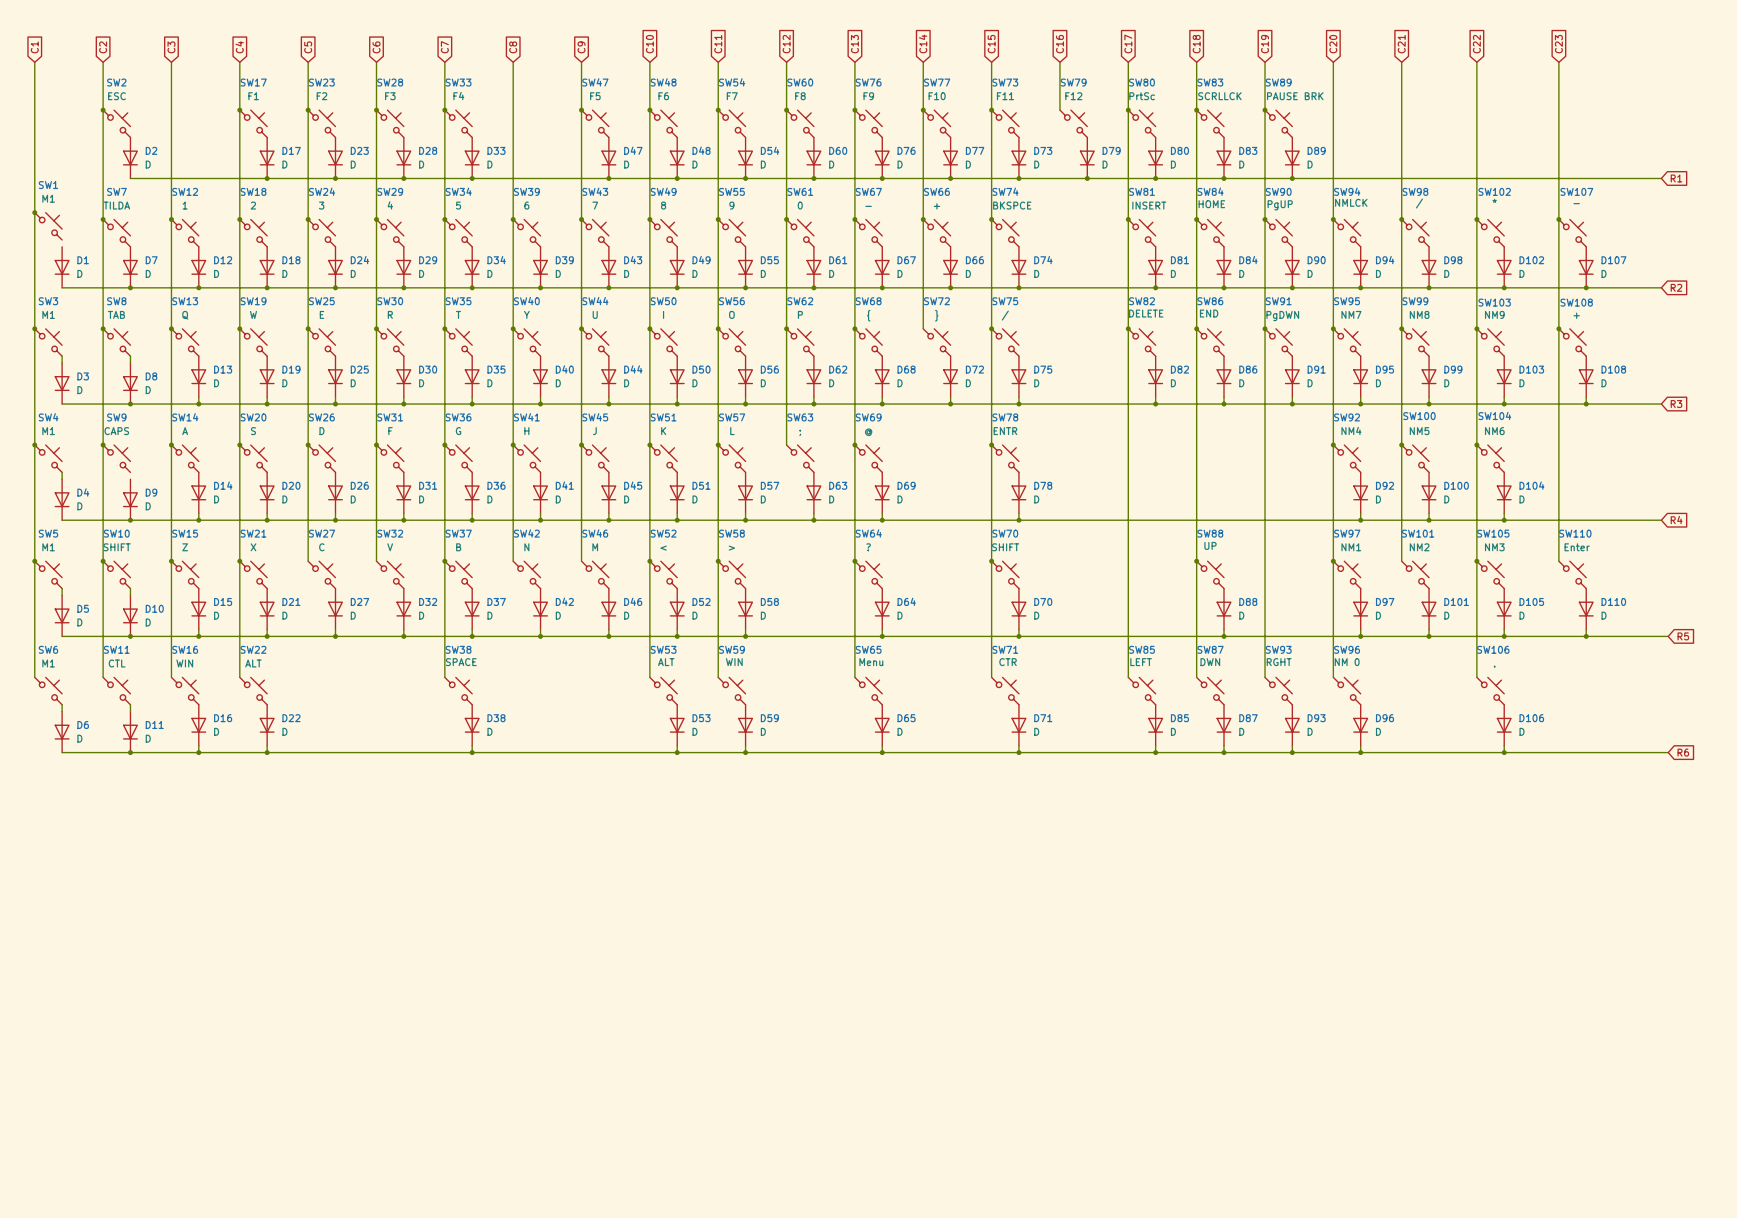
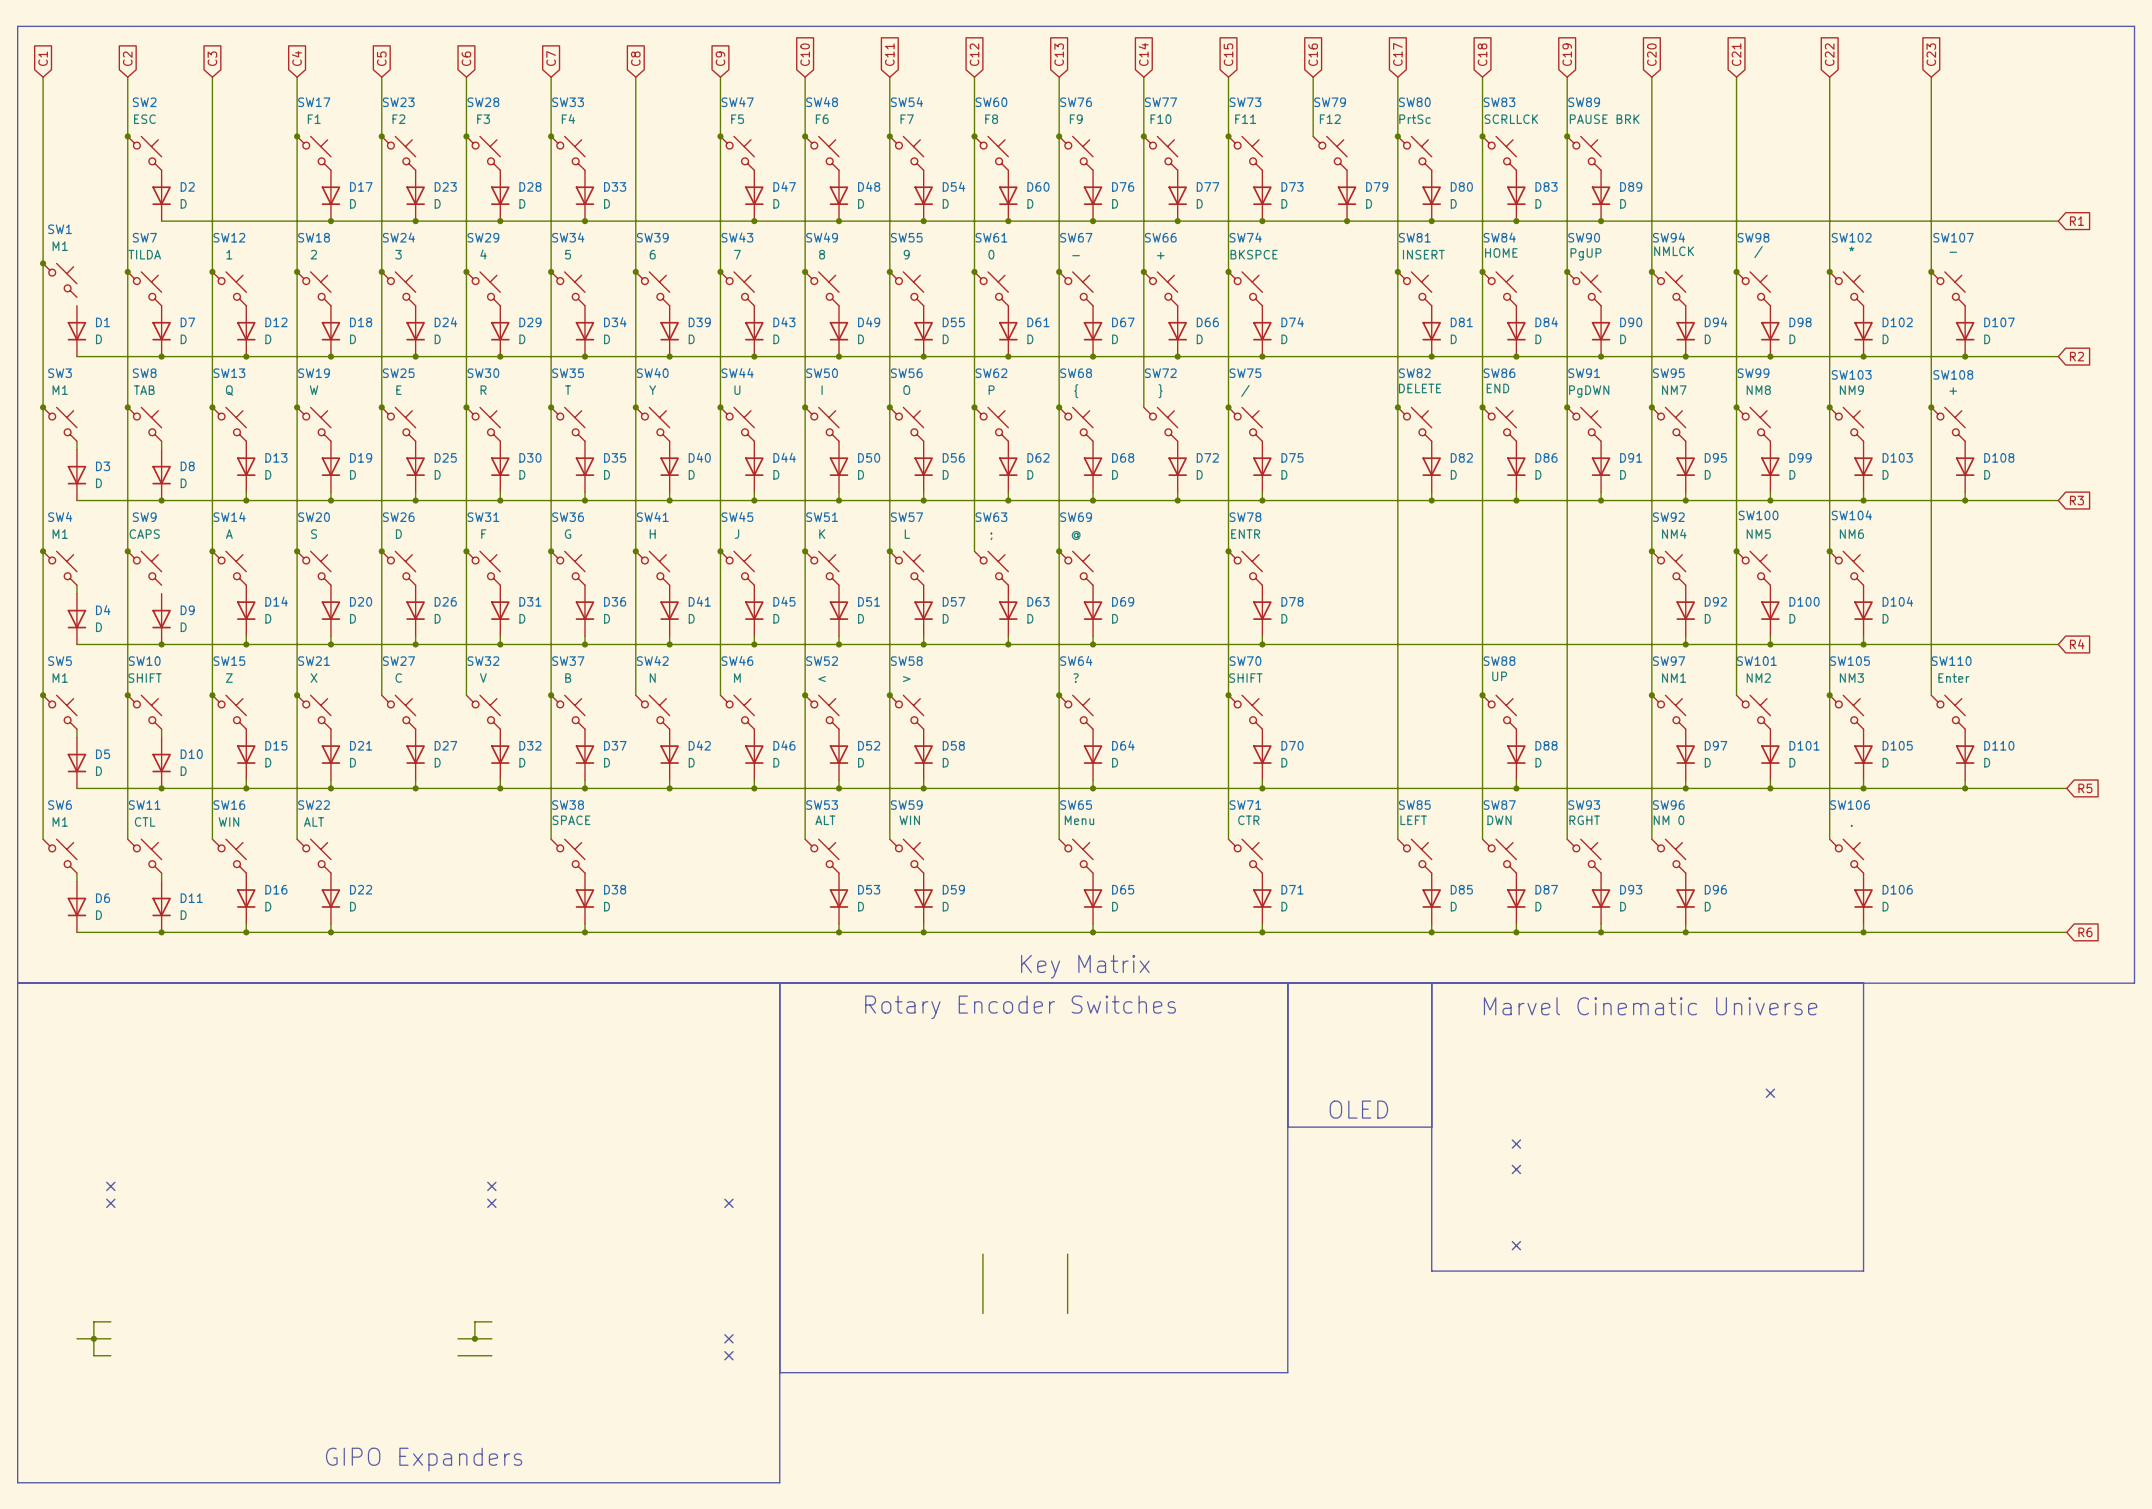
text: none -> Key Matrix (1085, 966)
line: none -> (17, 983) (2134, 983) (2134, 26) (17, 26) (17, 1482) (779, 1482) (779, 983)
line: none -> (1287, 983) (1287, 1372) (779, 1372)
line: none -> (1431, 983) (1431, 1271) (1863, 1271) (1863, 983)
text: none -> Marvel Cinematic Universe (1650, 1006)
text: none -> Rotary Encoder Switches (1020, 1007)
no-connect mark: none -> (1770, 1093)
text: none -> OLED (1358, 1109)
line: none -> (1287, 1127) (1431, 1127)
no-connect mark: none -> (1516, 1144)
no-connect mark: none -> (1516, 1169)
no-connect mark: none -> (110, 1186)
no-connect mark: none -> (491, 1186)
no-connect mark: none -> (110, 1203)
no-connect mark: none -> (491, 1203)
no-connect mark: none -> (728, 1203)
no-connect mark: none -> (1516, 1245)
wire: none -> (982, 1254) (982, 1313)
wire: none -> (1067, 1254) (1067, 1313)
wire: none -> (110, 1321) (93, 1321) (93, 1355) (110, 1355)
wire: none -> (491, 1321) (474, 1321) (474, 1338)
wire: none -> (76, 1338) (110, 1338)
junction: none -> (93, 1338)
wire: none -> (457, 1338) (491, 1338)
junction: none -> (474, 1338)
no-connect mark: none -> (728, 1338)
wire: none -> (457, 1355) (491, 1355)
no-connect mark: none -> (728, 1355)
text: none -> GIPO Expanders (424, 1459)

